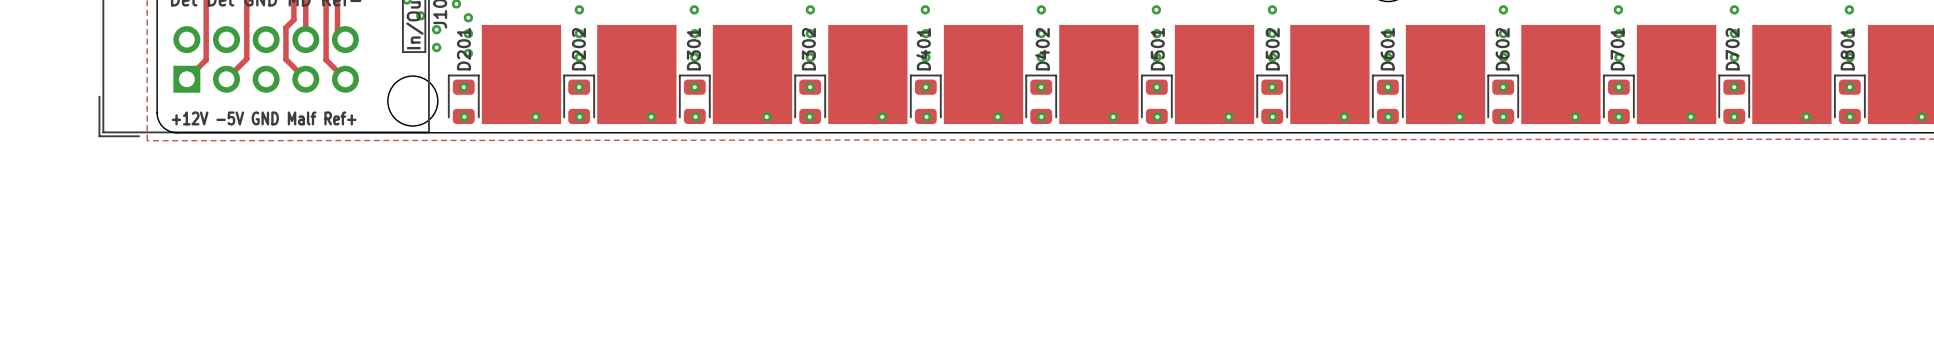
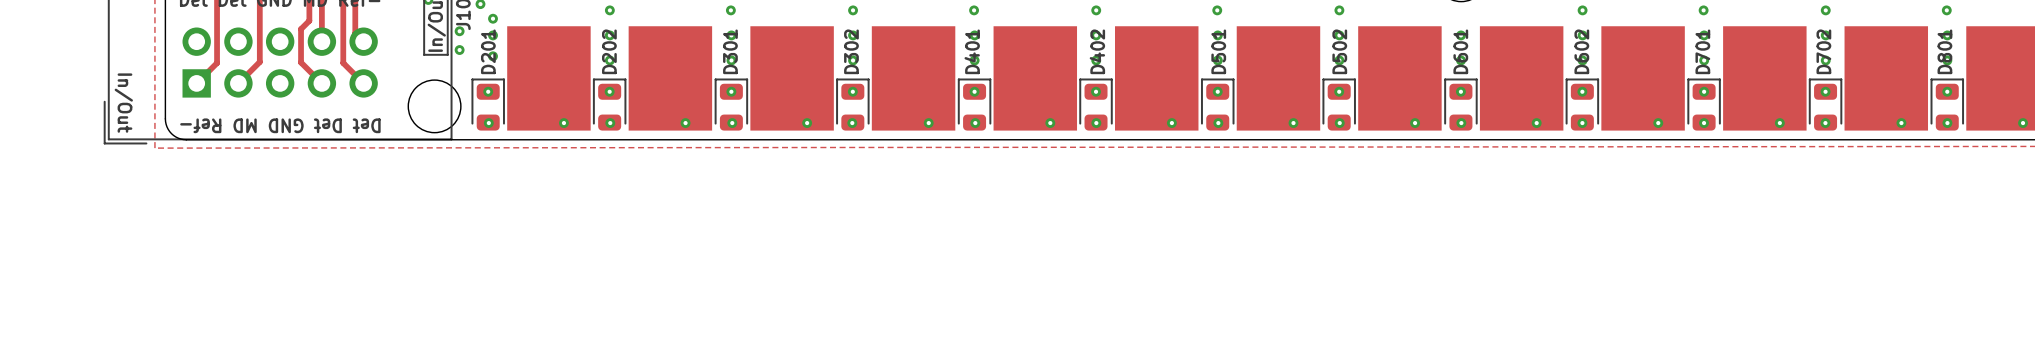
via: (420, 15) -> none
text: none -> In/Out (123, 103)
text: +12V -5V GND Malf Ref+ (264, 118) -> Det Det GND MD Ref- (280, 125)

